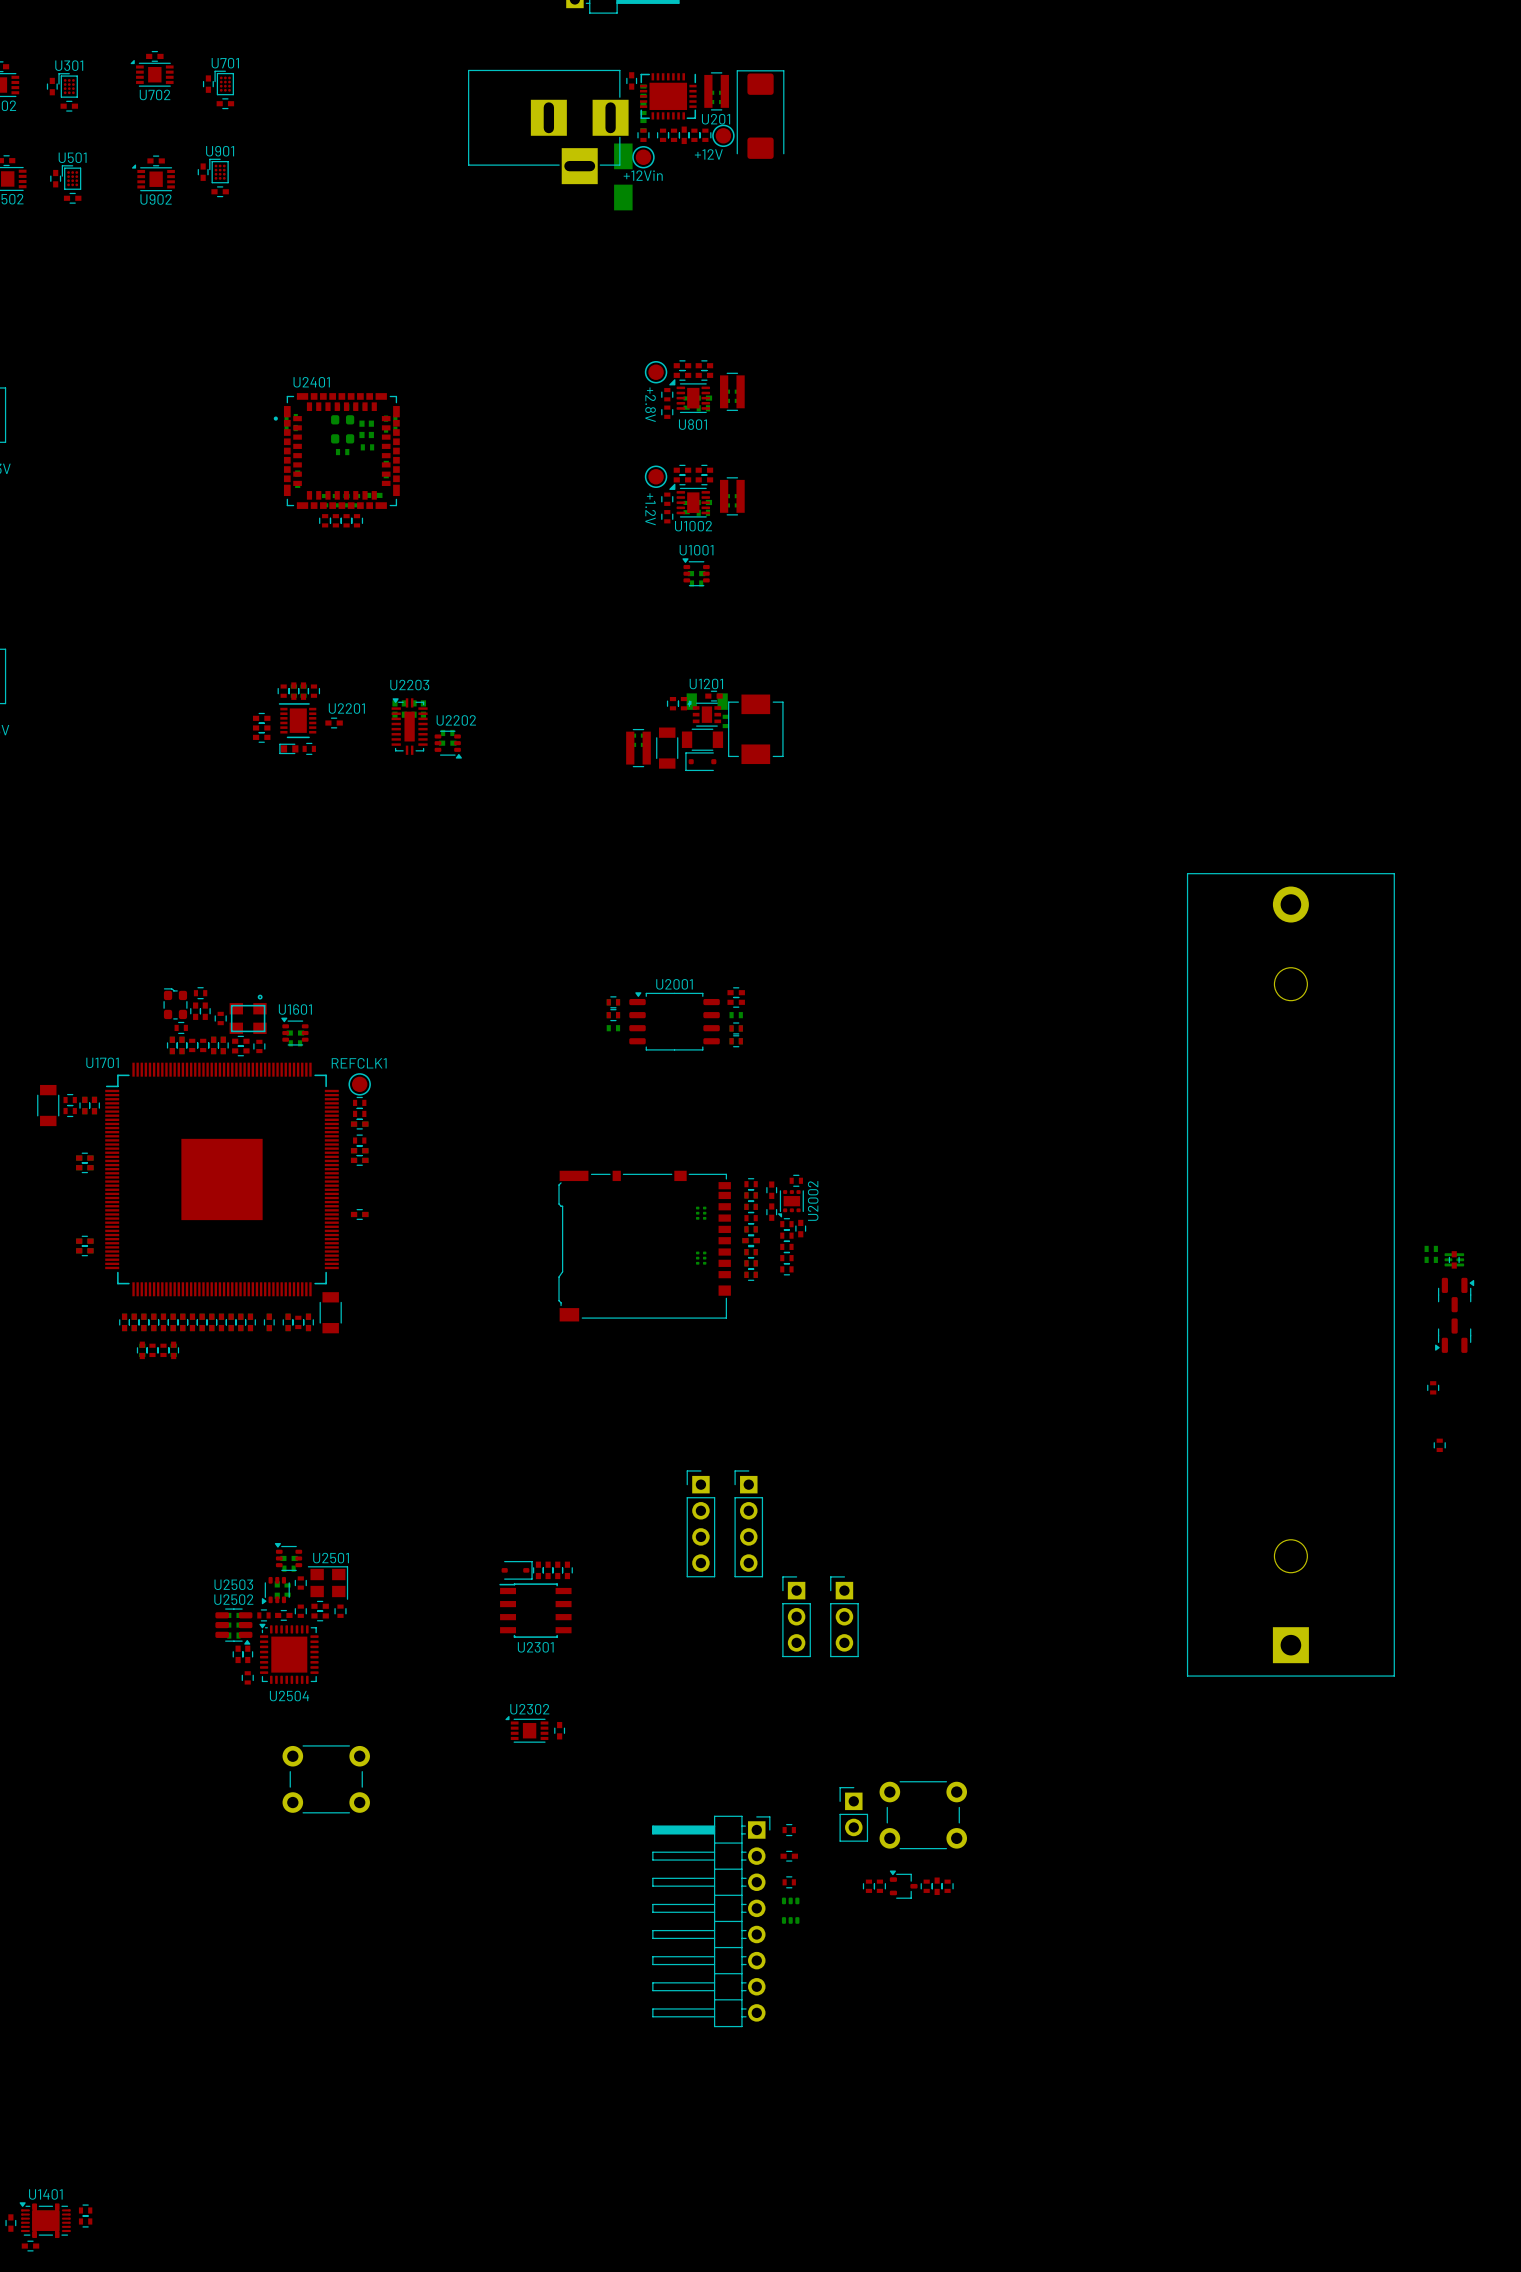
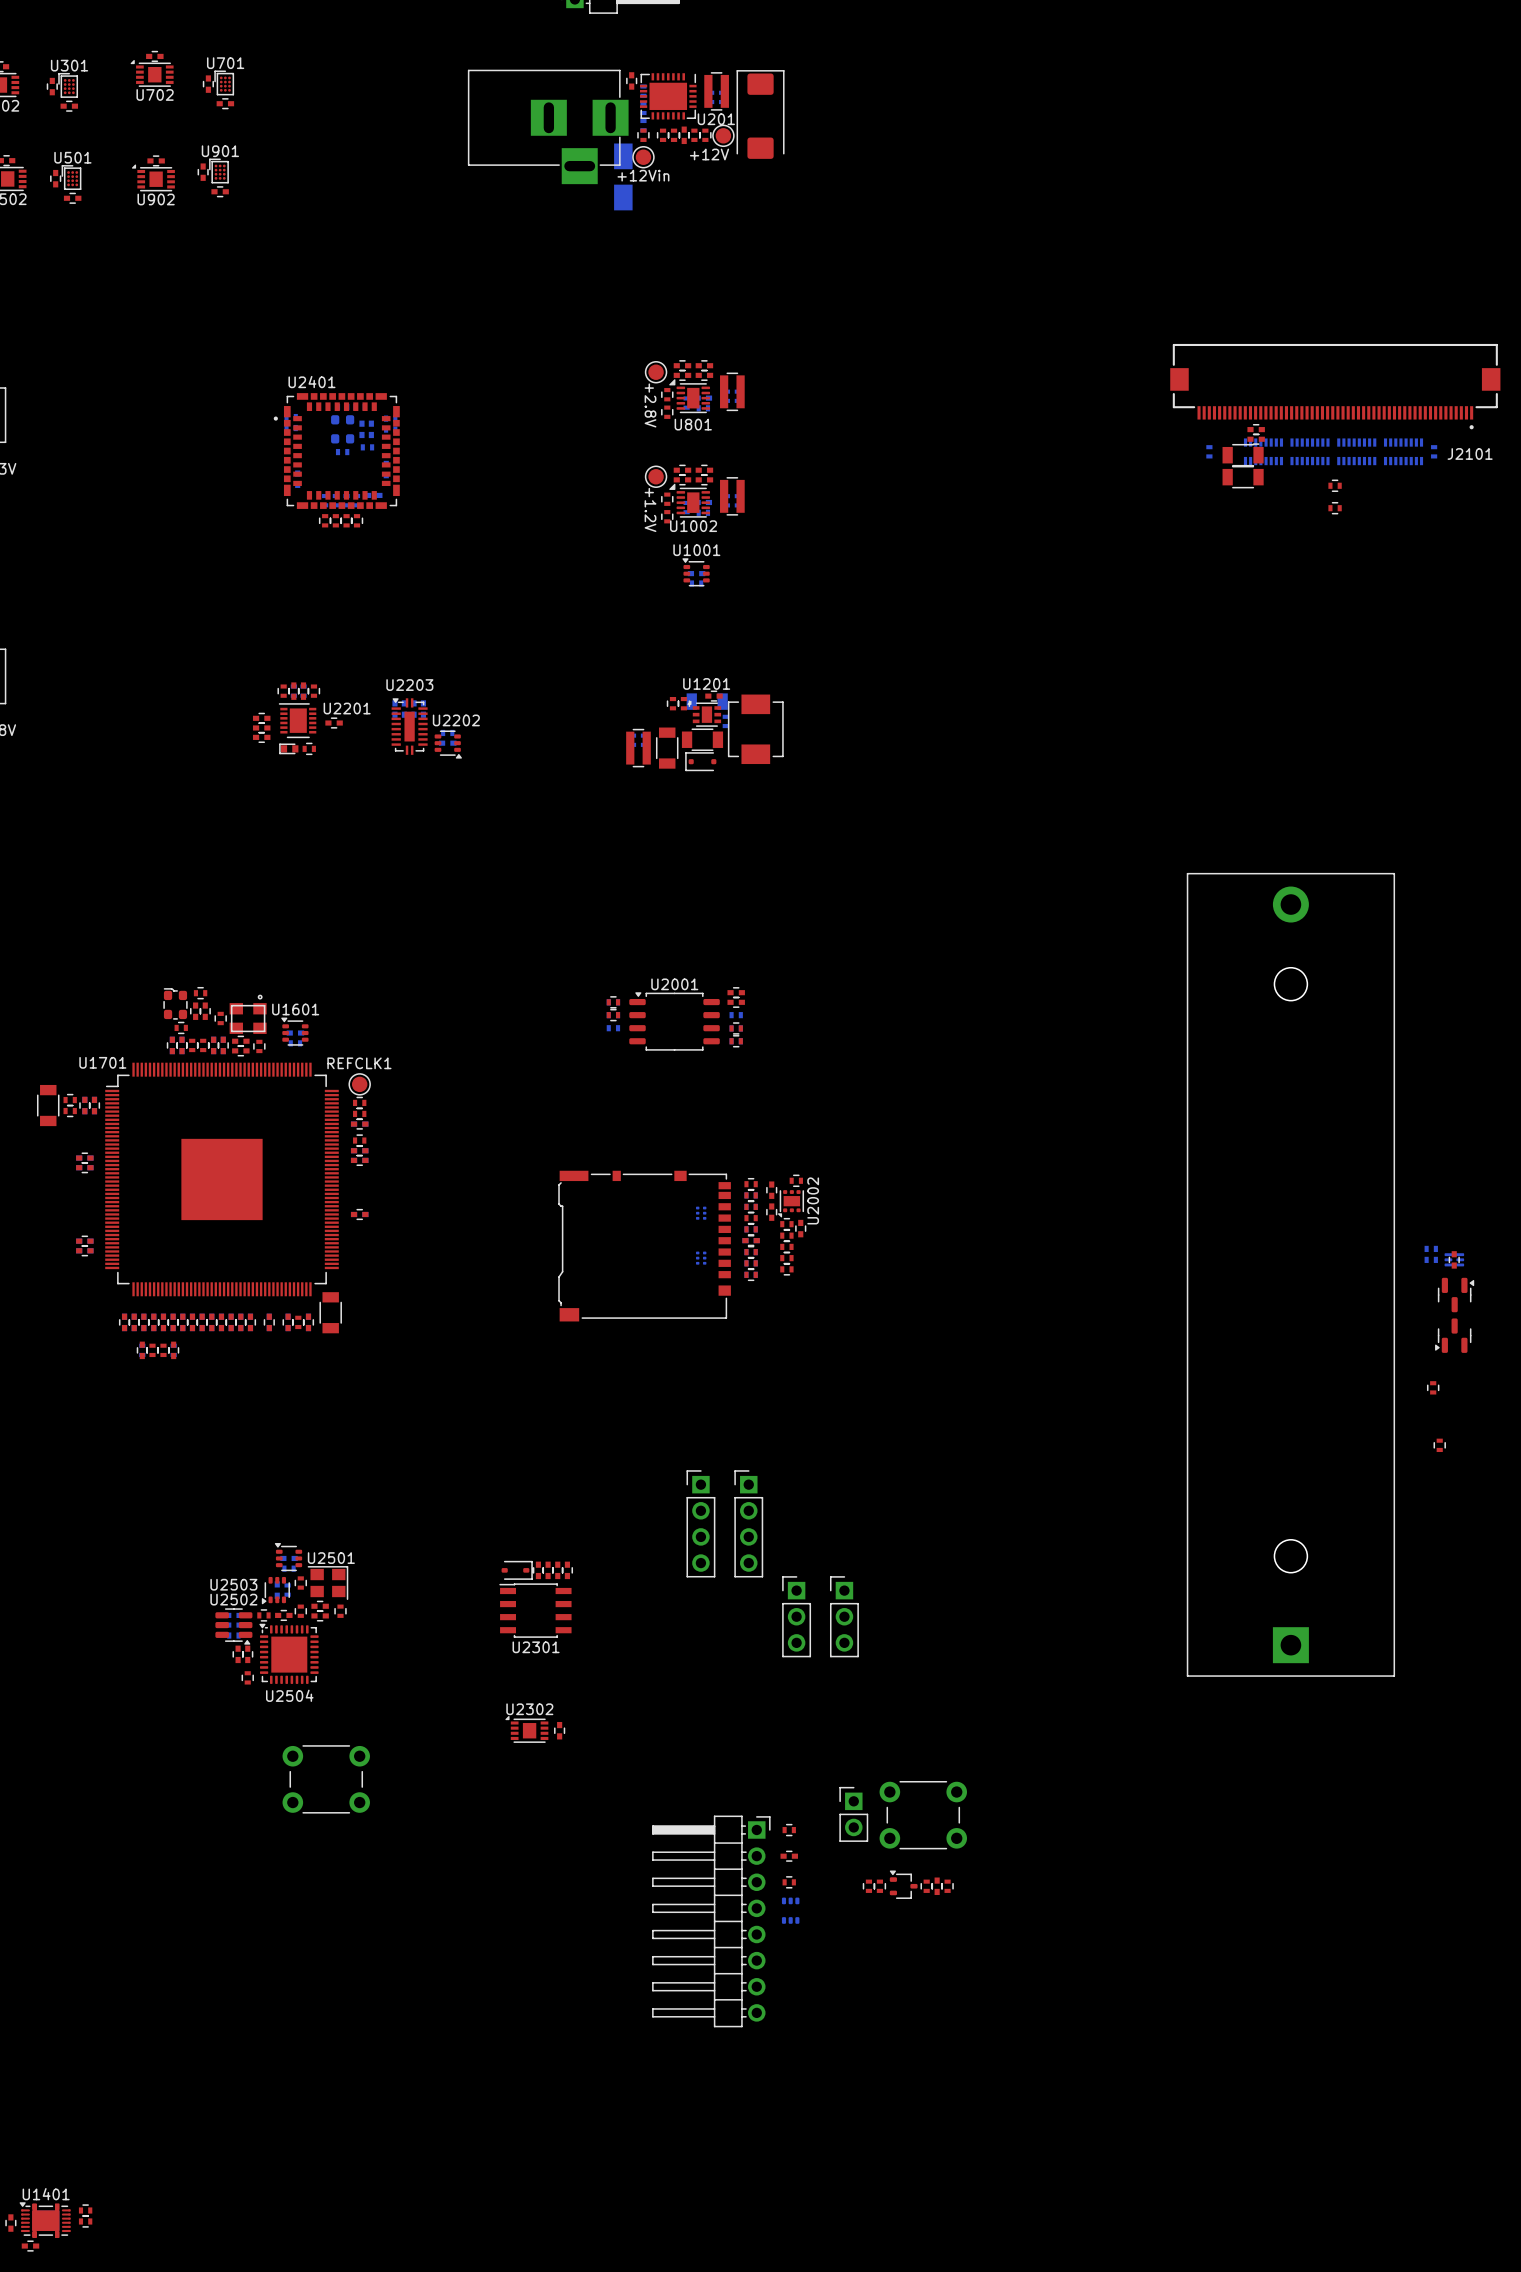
J2101: none -> (1335, 386)
part: none -> (1256, 429)
part: none -> (1256, 439)
part: none -> (1209, 451)
part: none -> (1263, 451)
part: none -> (1309, 451)
part: none -> (1356, 451)
part: none -> (1403, 451)
part: none -> (1434, 451)
part: none -> (1243, 455)
part: none -> (1243, 477)
part: none -> (1335, 485)
part: none -> (1335, 508)

